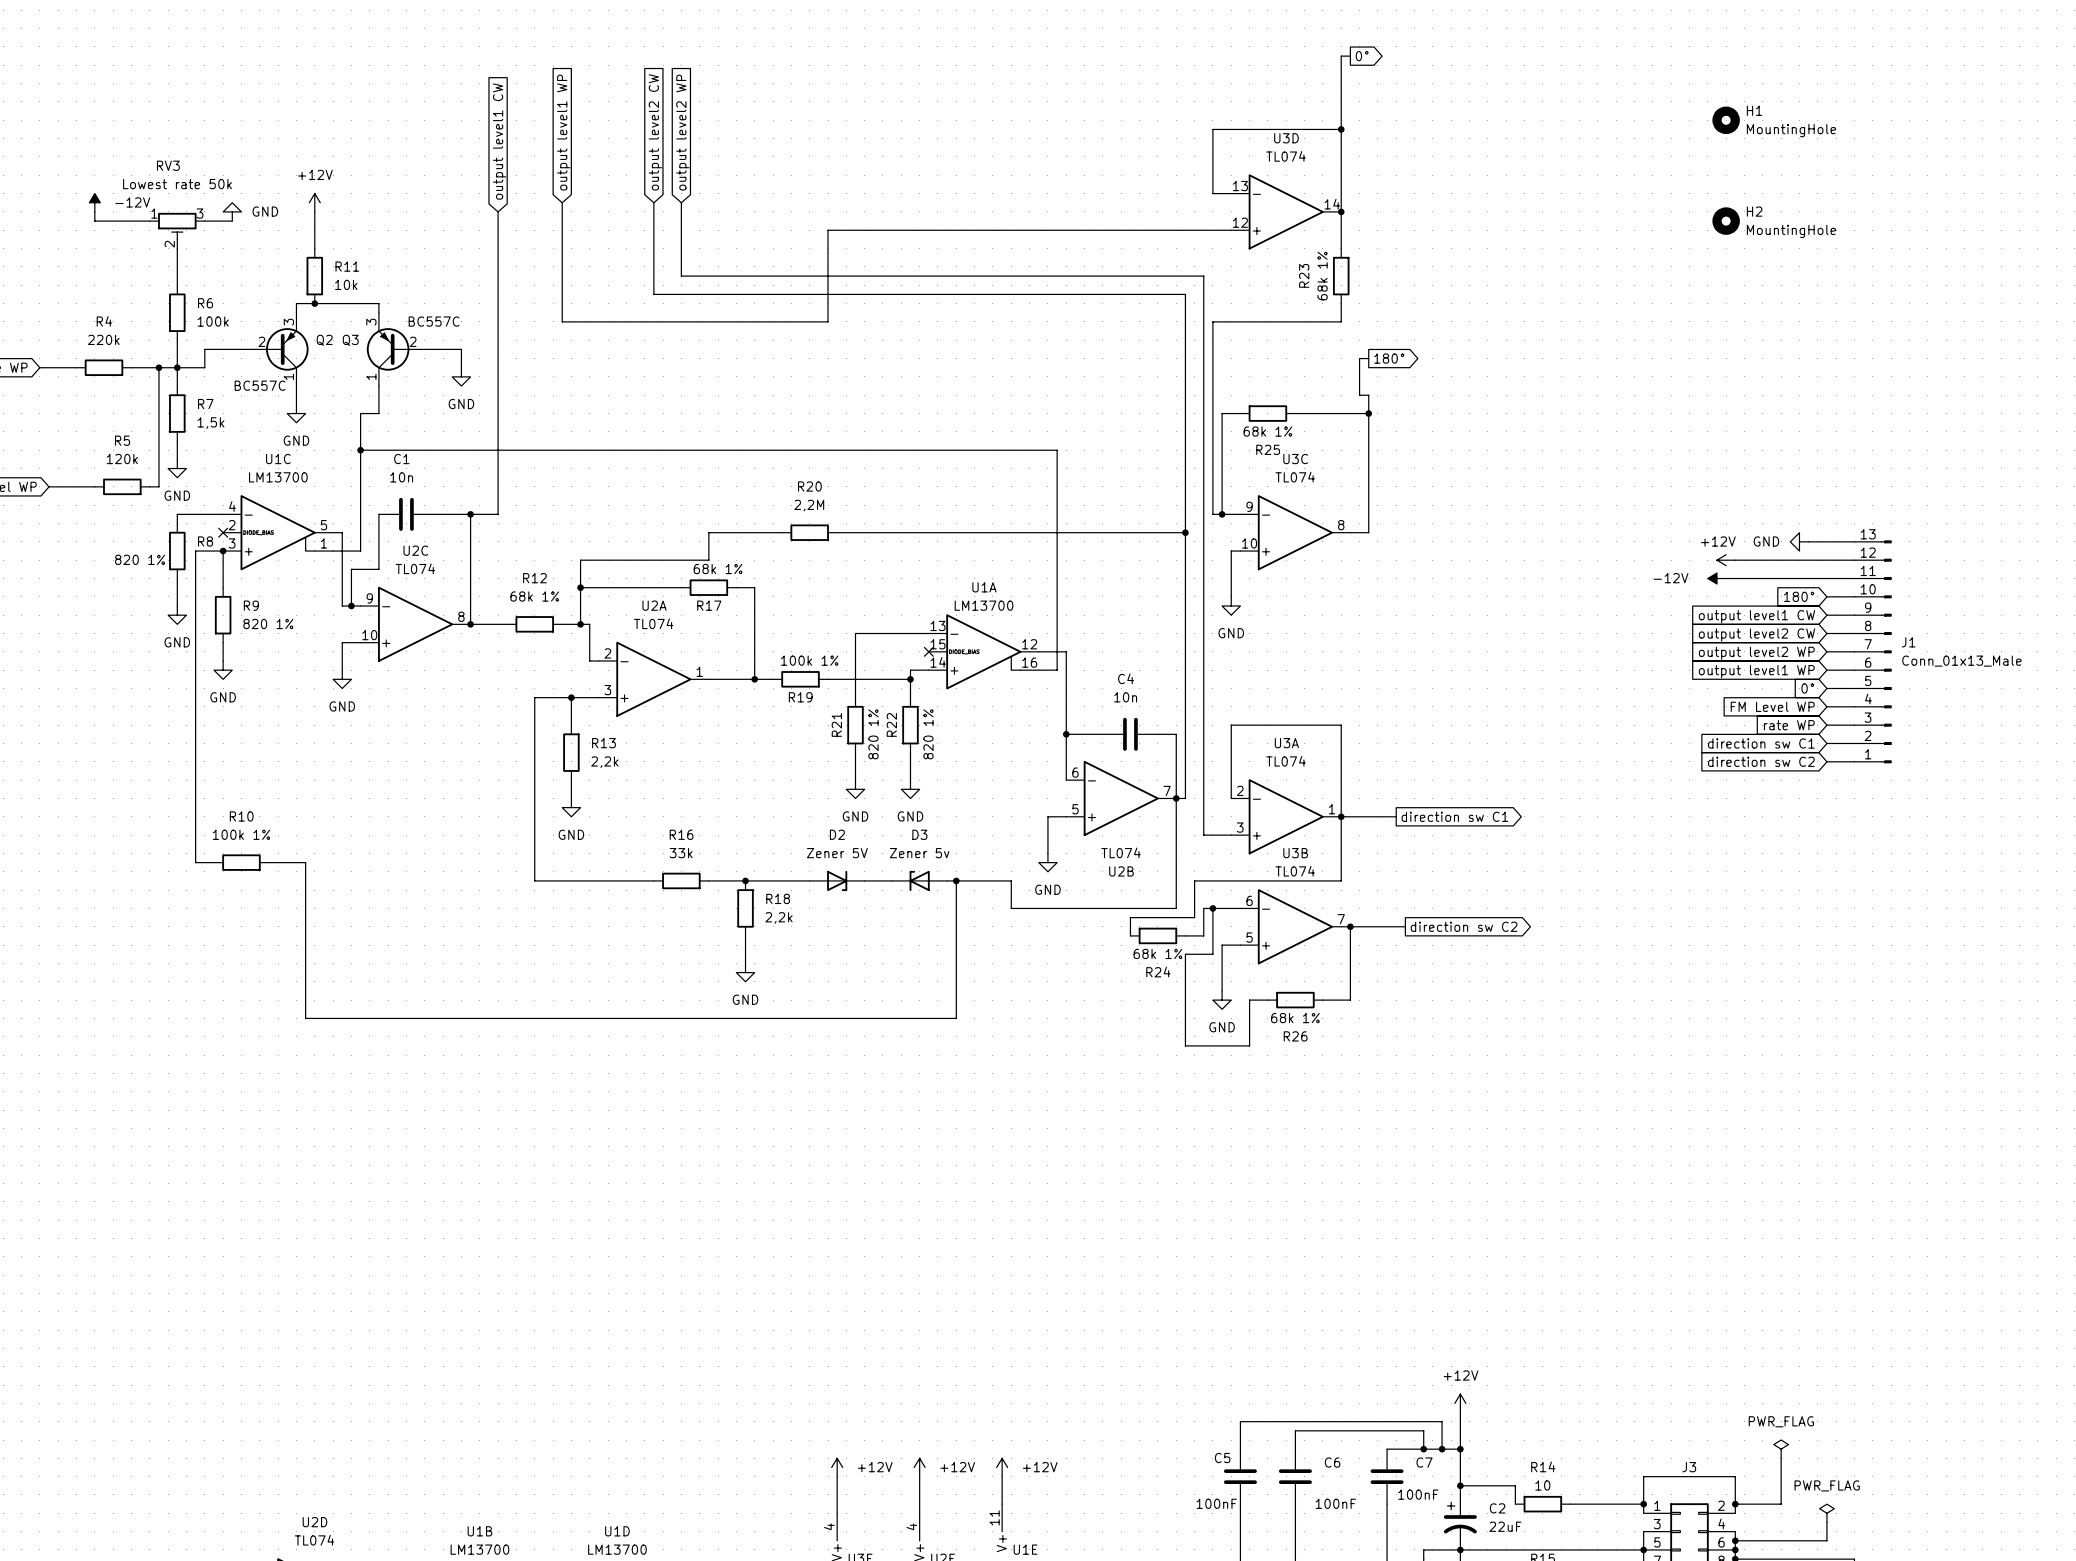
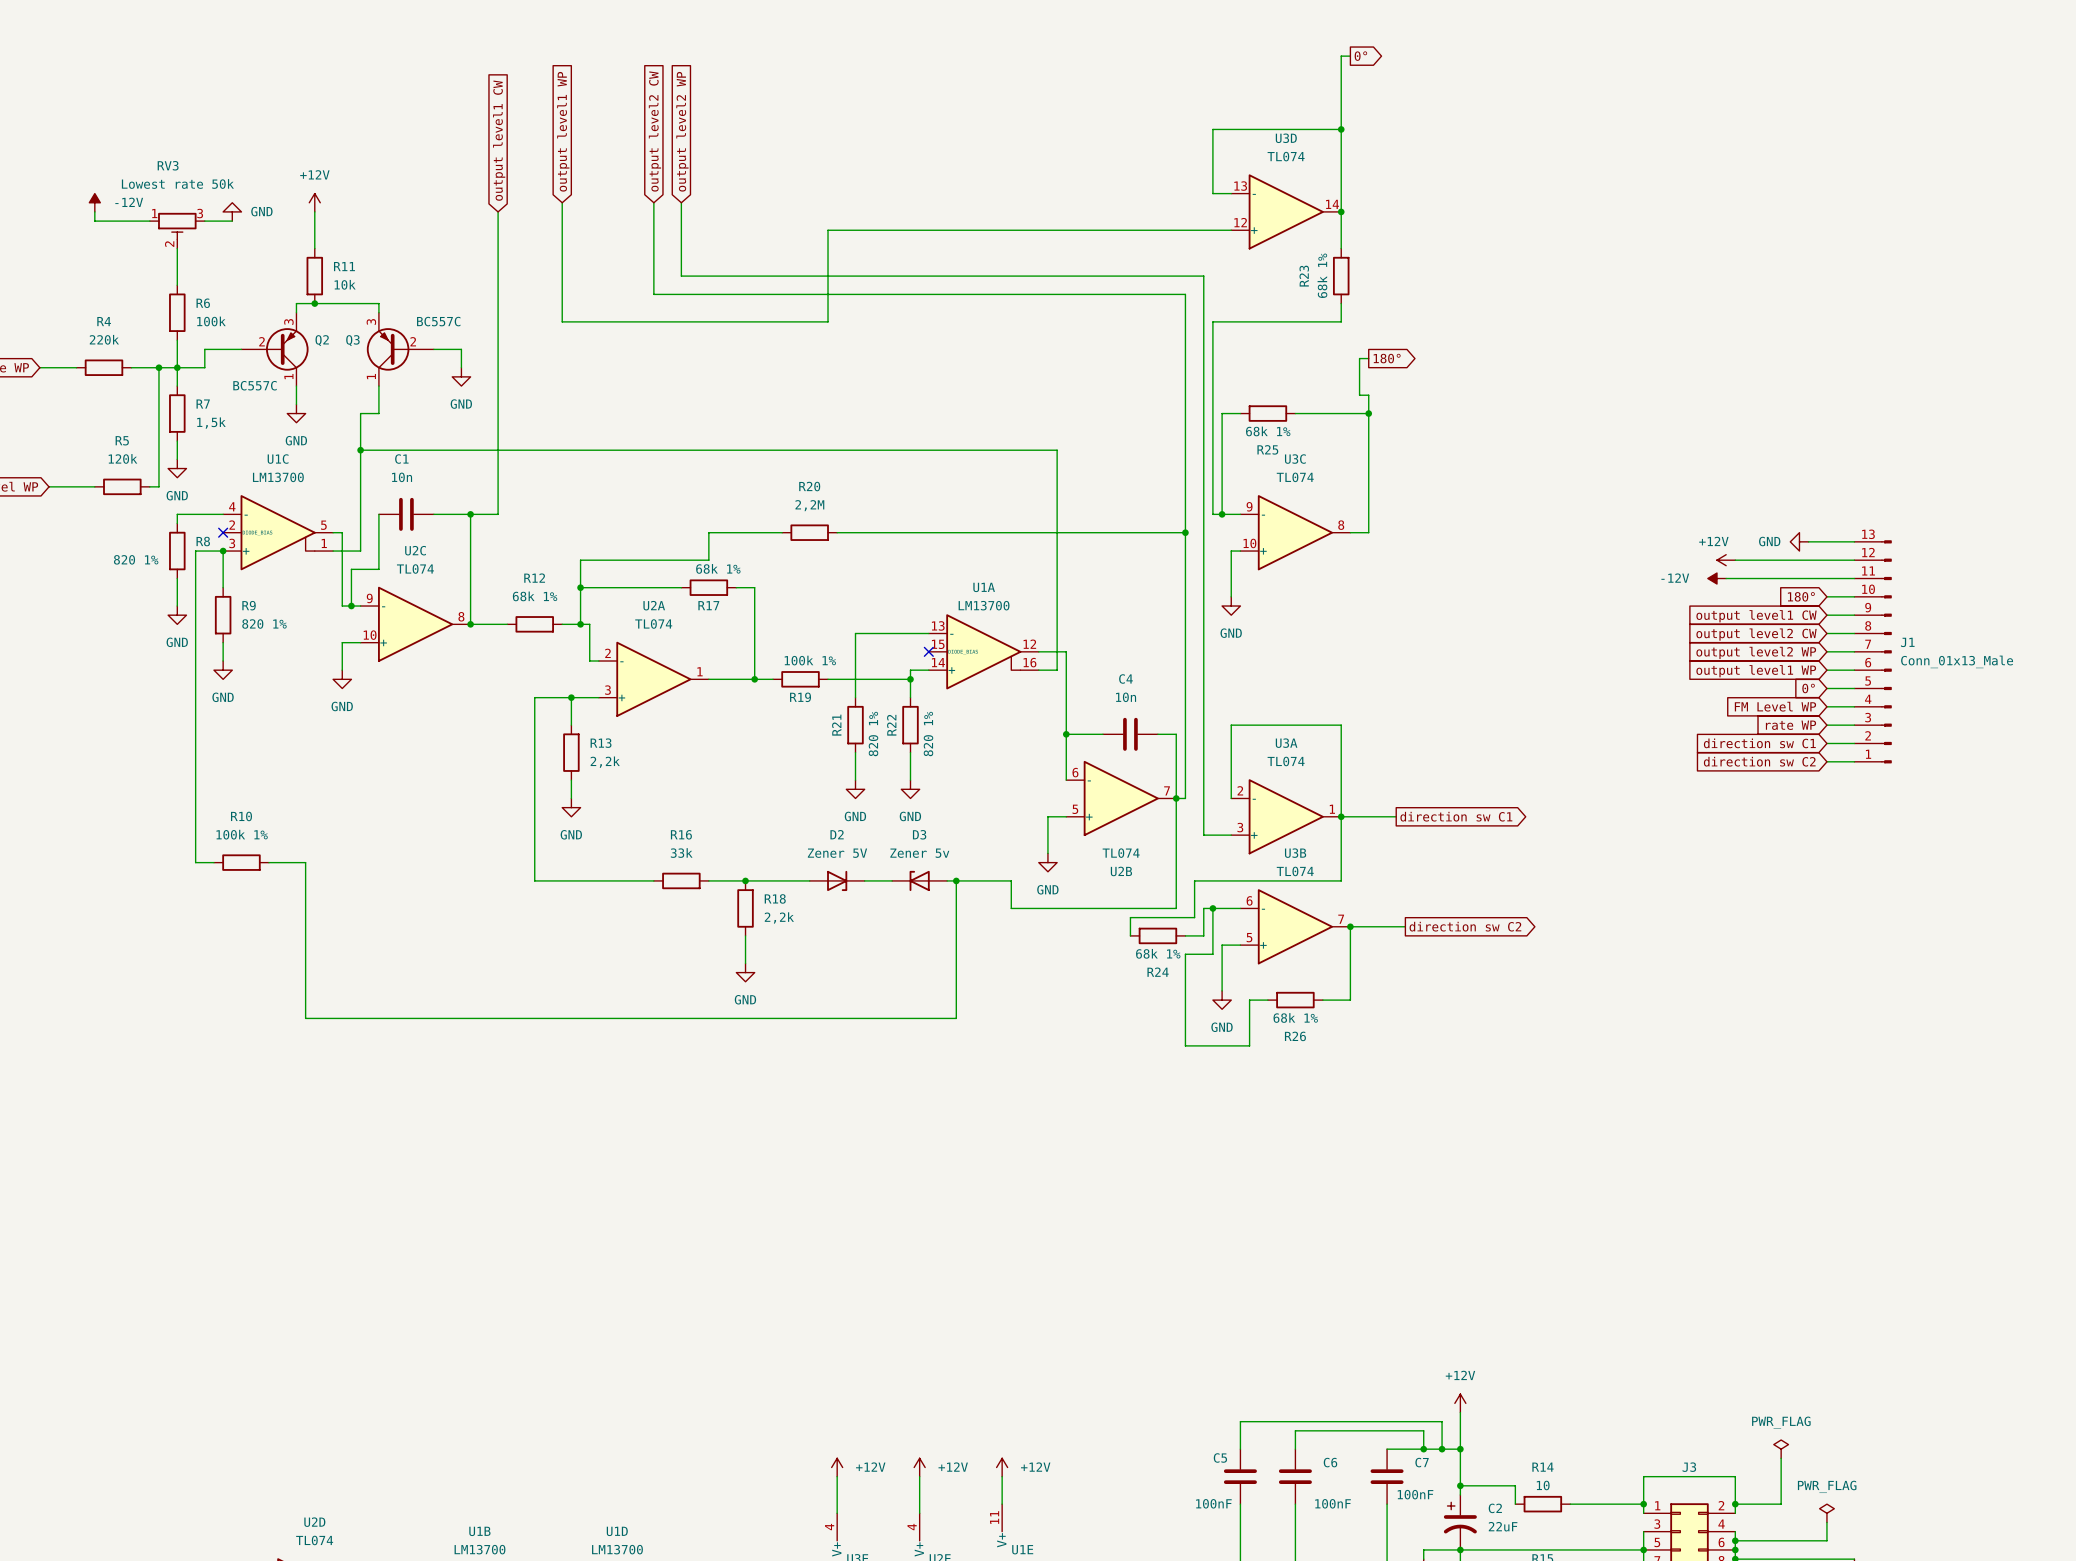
H1: MountingHole (1726, 120) -> none
H2: MountingHole (1726, 221) -> none

